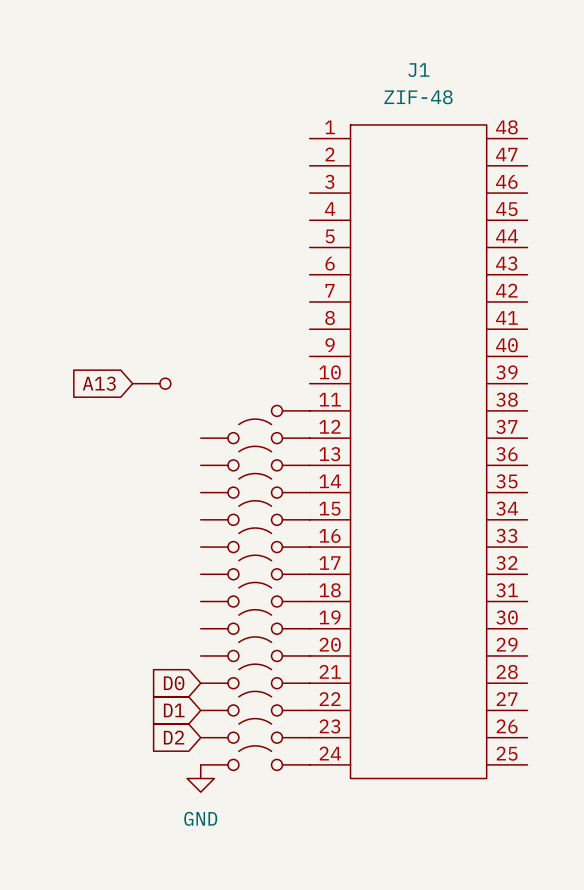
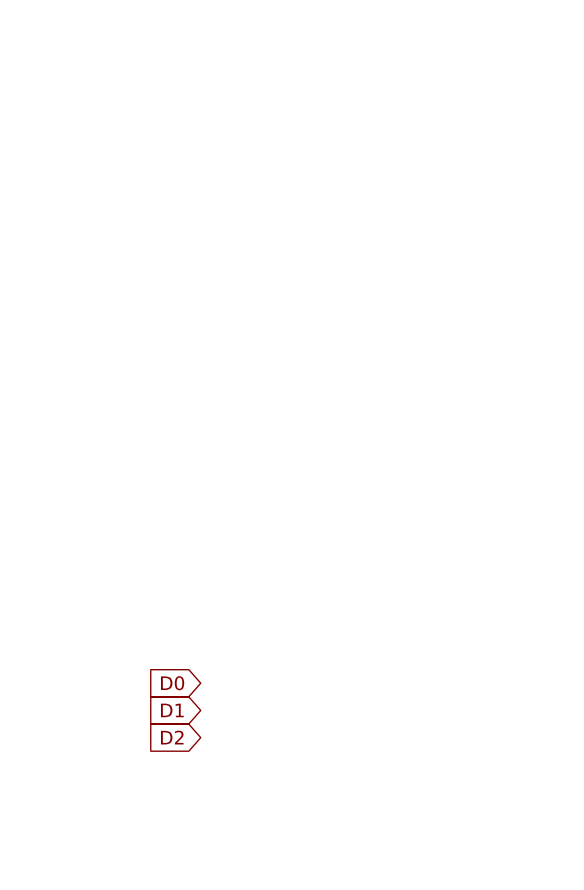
global label: A13 (99, 383) -> none
part: (151, 383) -> none
part: (290, 410) -> none
part: (255, 431) -> none
J1: ZIF-48 (418, 451) -> none
part: (255, 458) -> none
part: (255, 485) -> none
part: (255, 513) -> none
part: (255, 540) -> none
part: (255, 567) -> none
part: (255, 594) -> none
part: (255, 621) -> none
part: (255, 649) -> none
part: (255, 676) -> none
part: (255, 703) -> none
part: (255, 730) -> none
part: (255, 758) -> none
power symbol: GND (200, 778) -> none

